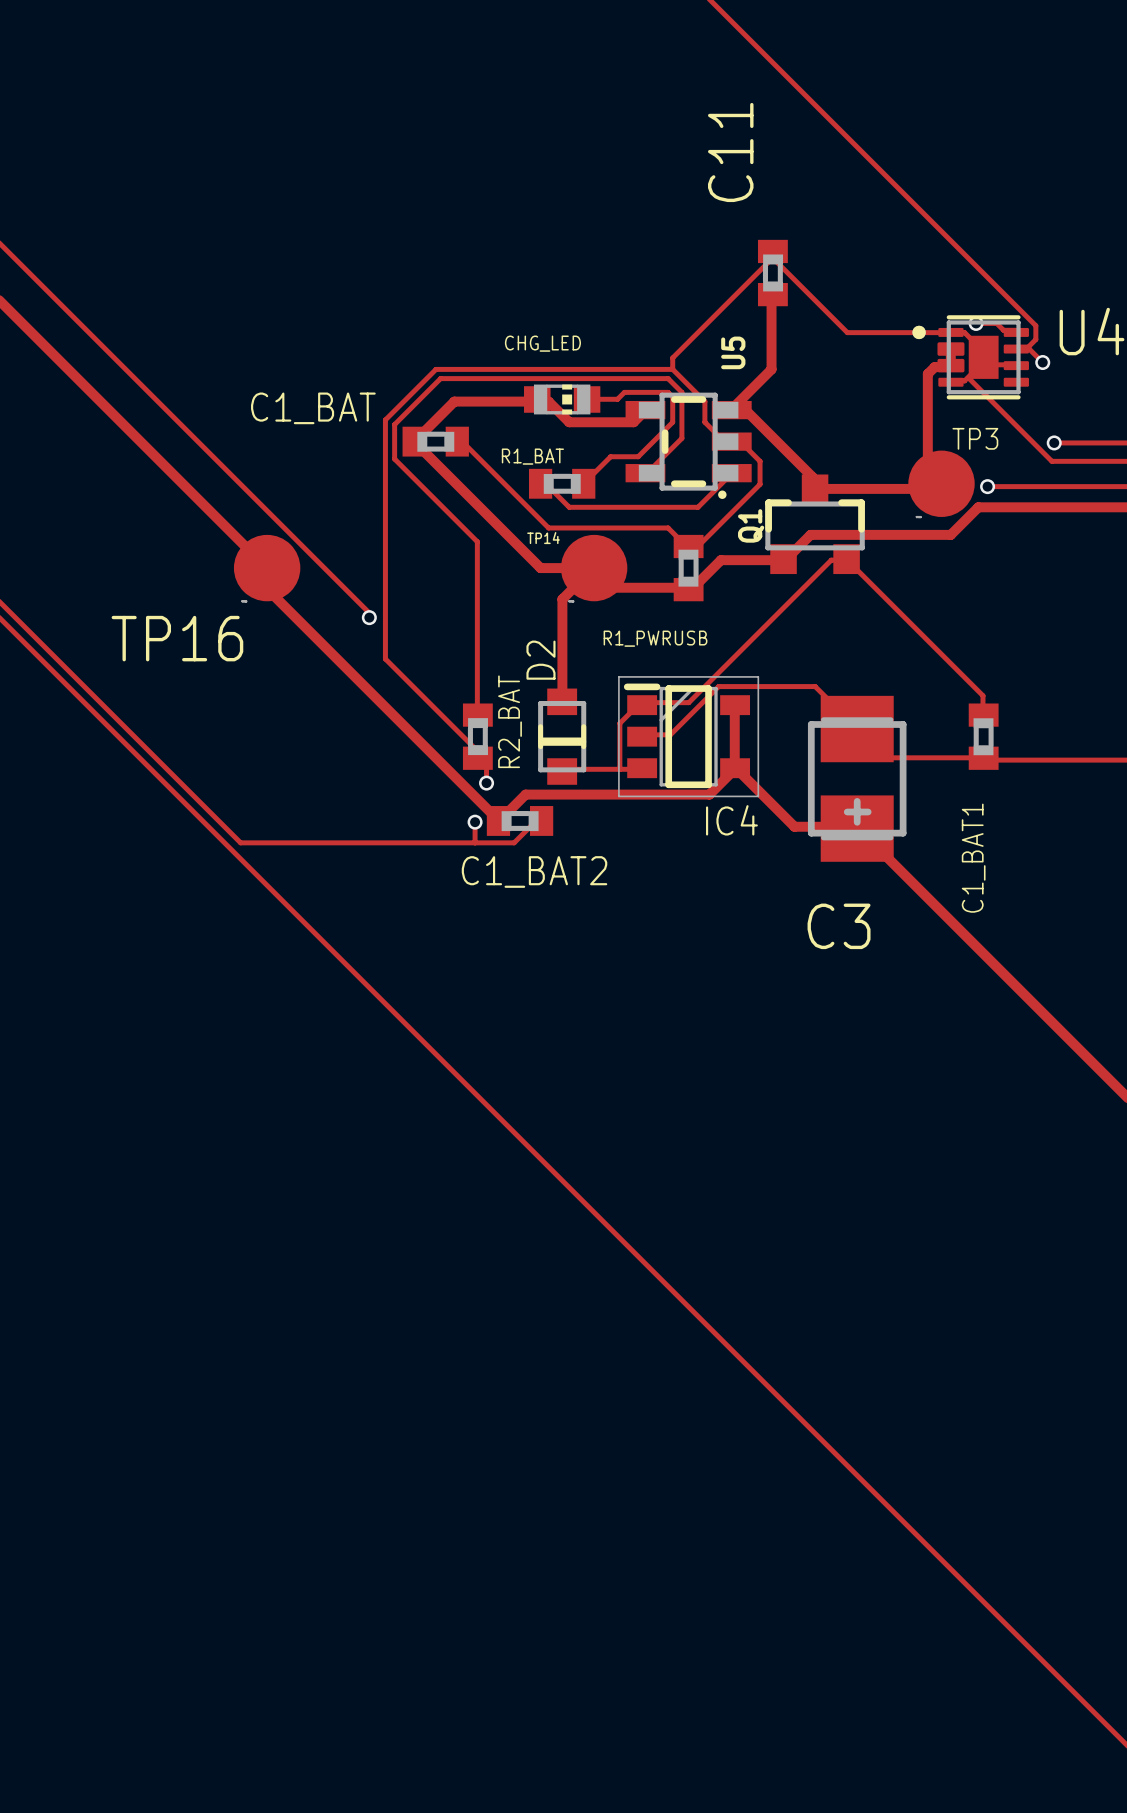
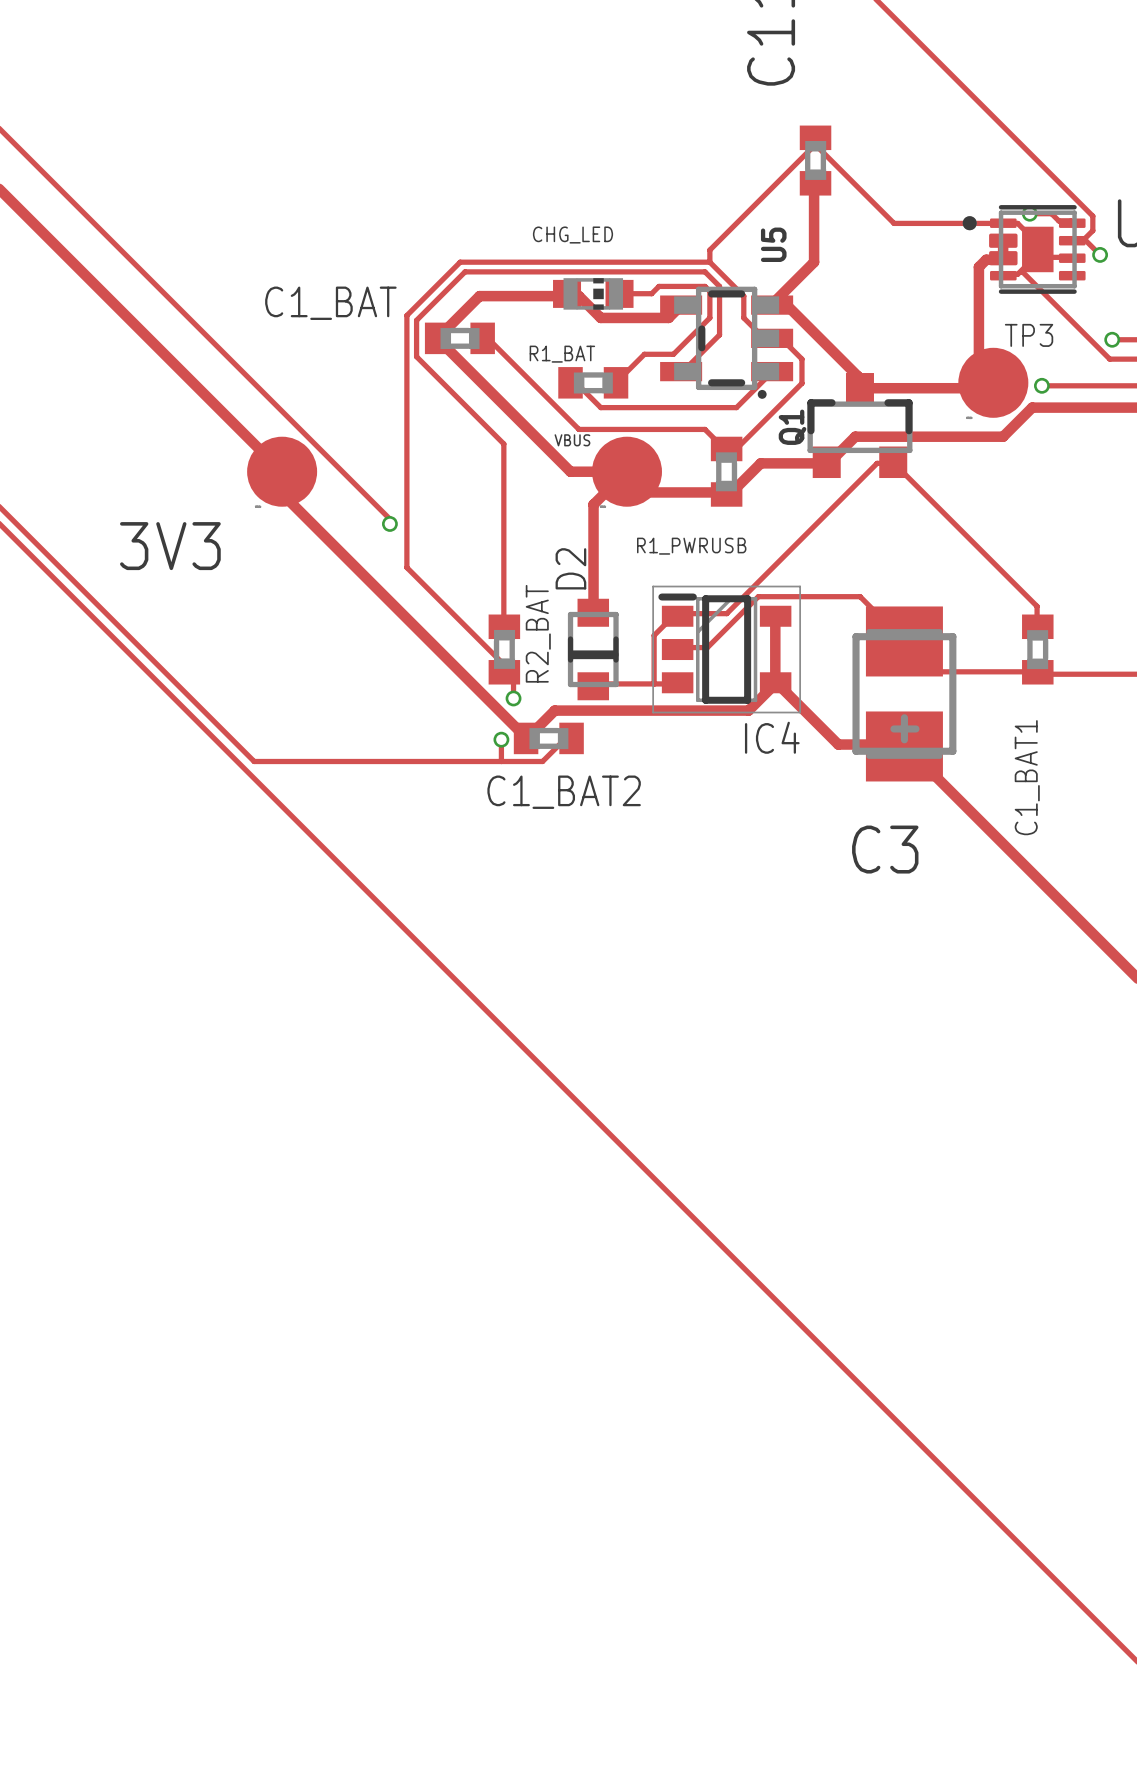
TP14 name: TP14 (543, 538) -> VBUS (572, 440)
TP16 name: TP16 (177, 638) -> 3V3 (170, 546)

